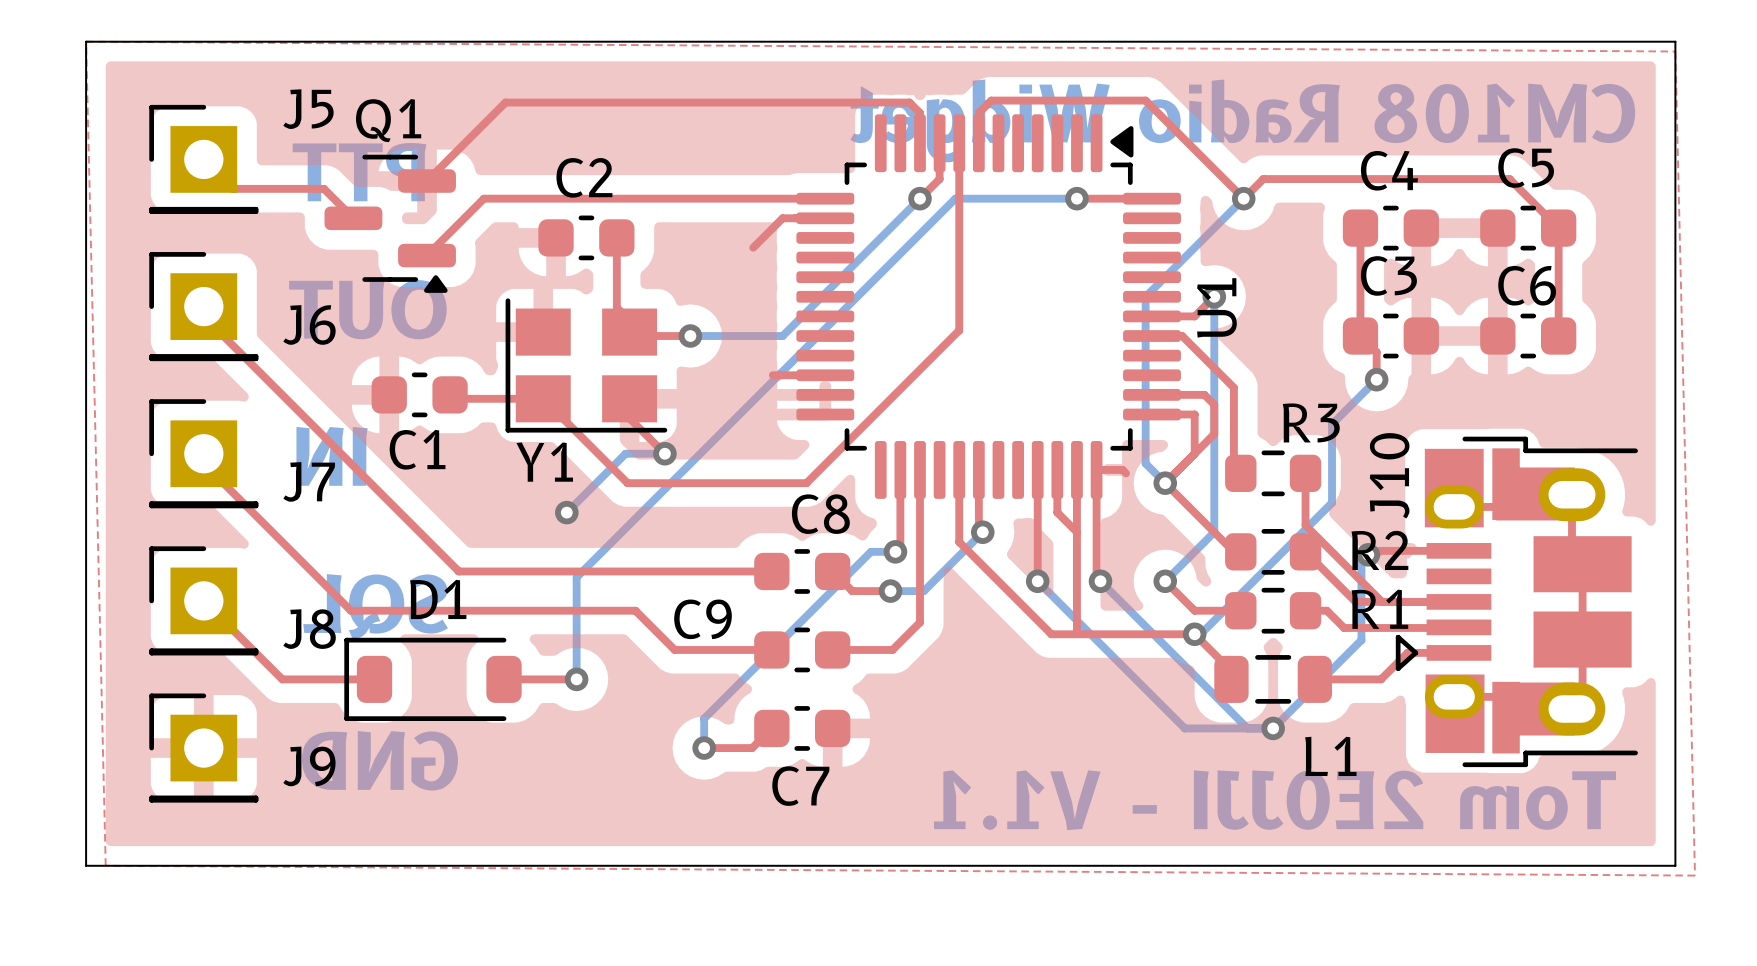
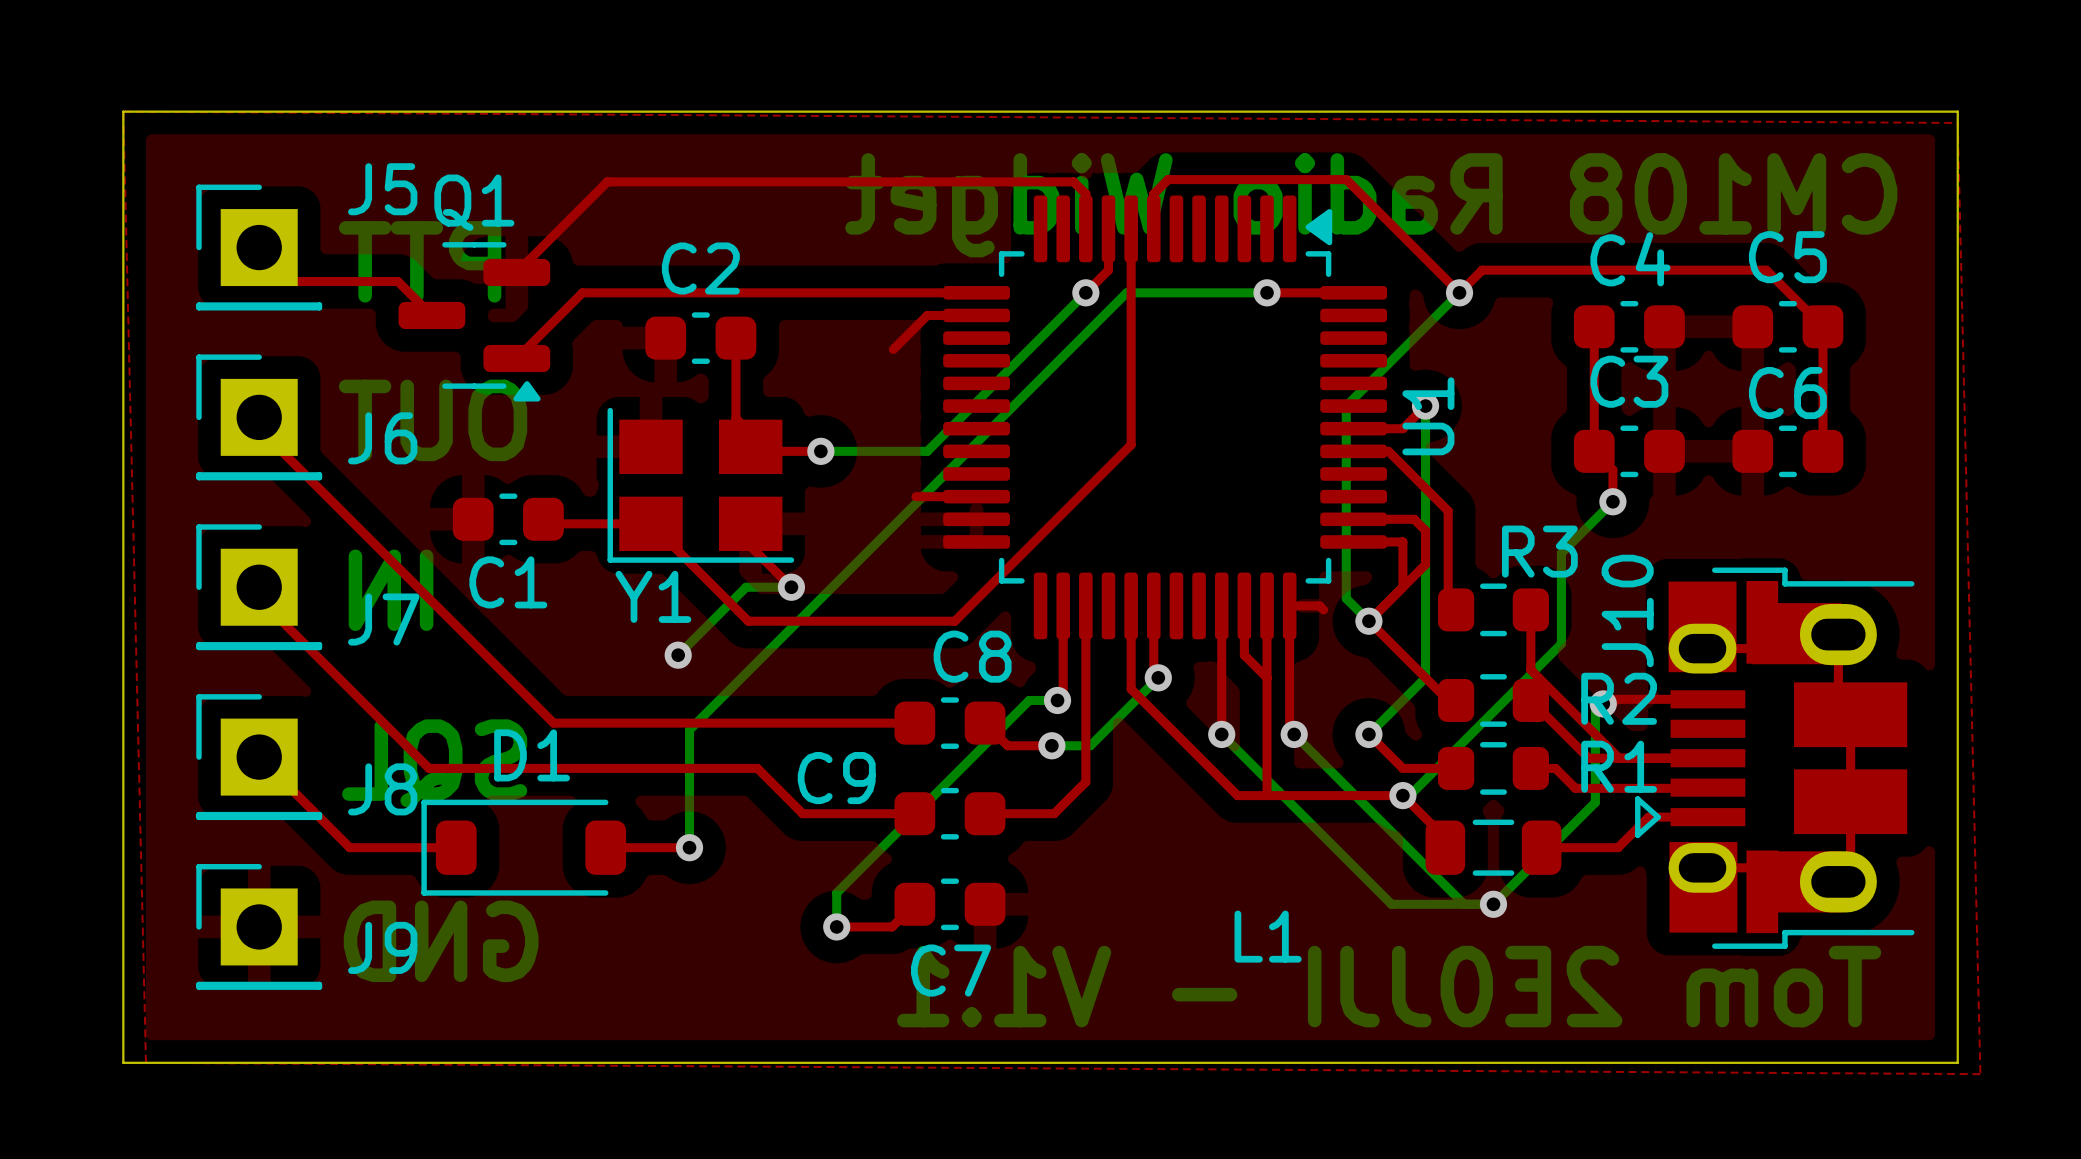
L1 name position: L1 (1330, 756) -> L1 (1268, 936)

